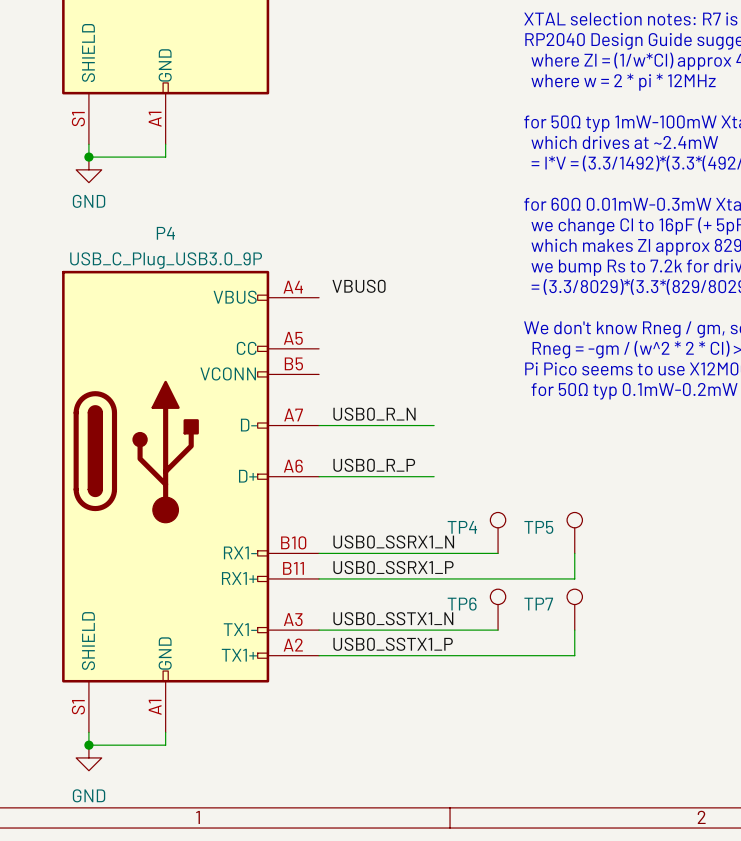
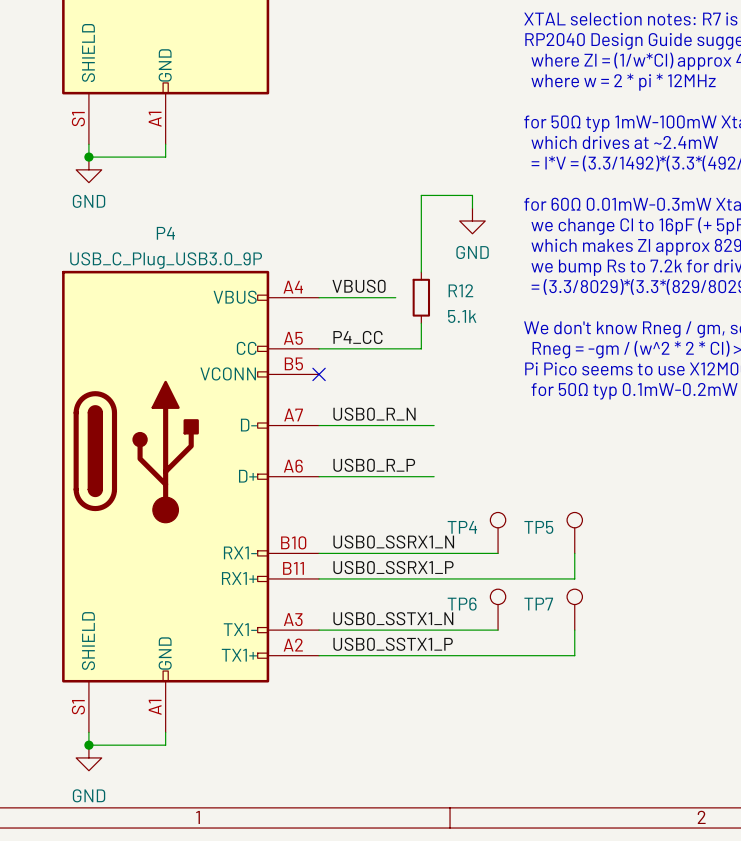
wire: none -> (472, 208) (472, 195) (421, 195) (421, 272)
power symbol: none -> GND (472, 221)
wire: none -> (319, 297) (395, 297)
R12: none -> 5.1k (421, 297)
wire: none -> (421, 323) (421, 348) (319, 348)
label: none -> P4_CC (357, 337)
no-connect mark: none -> (319, 374)

